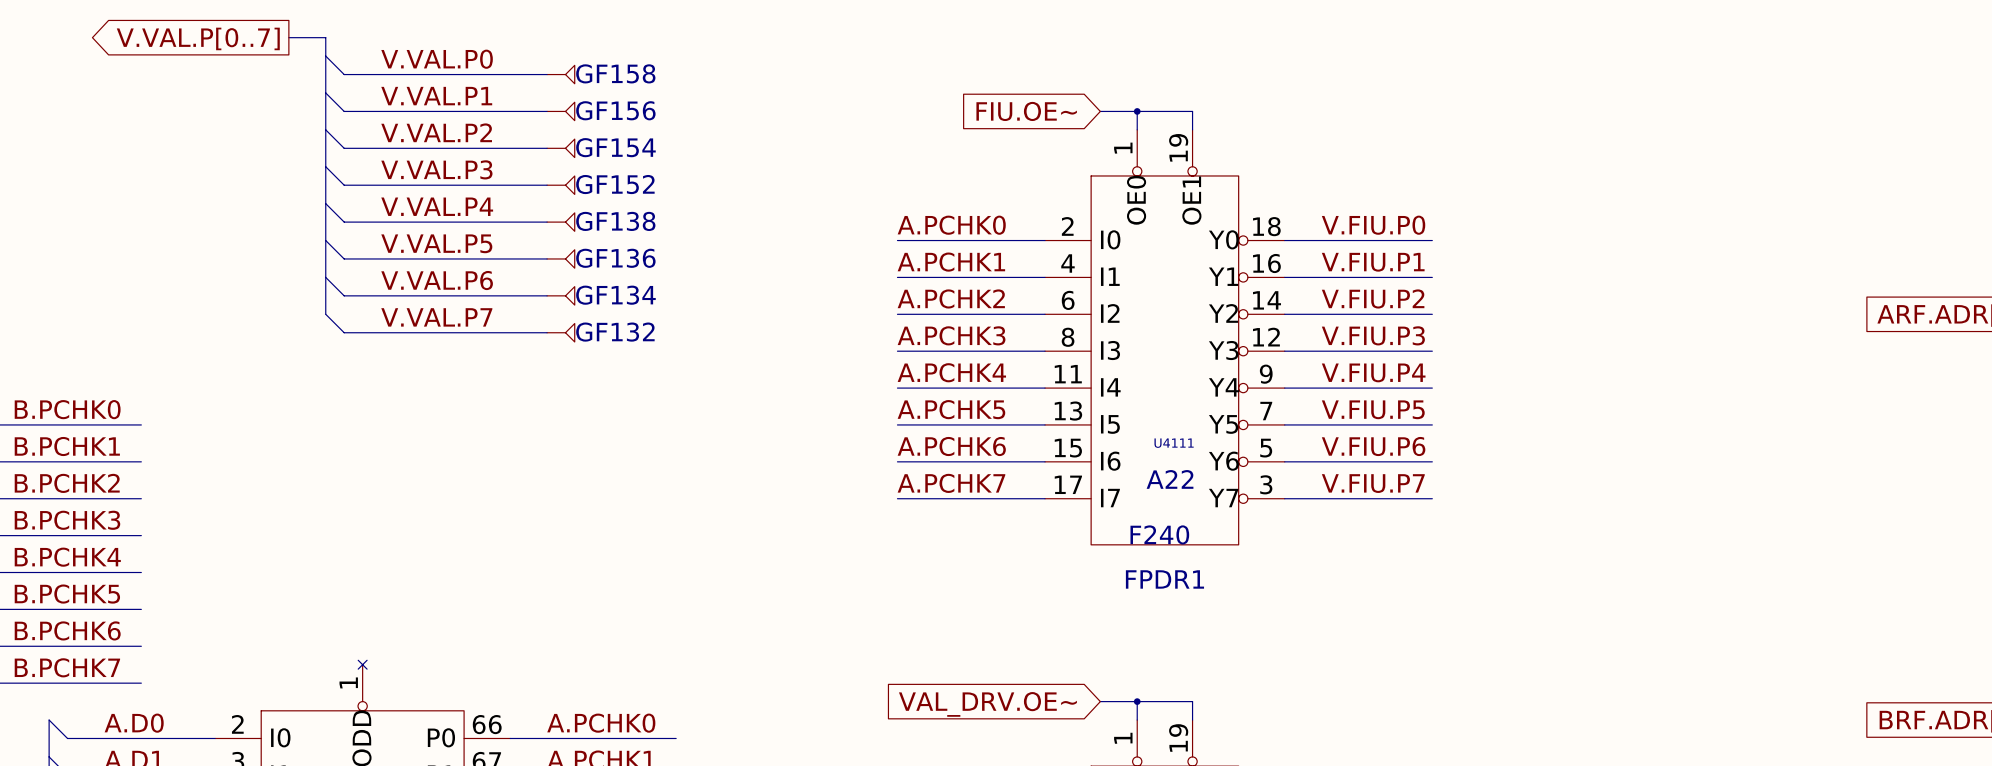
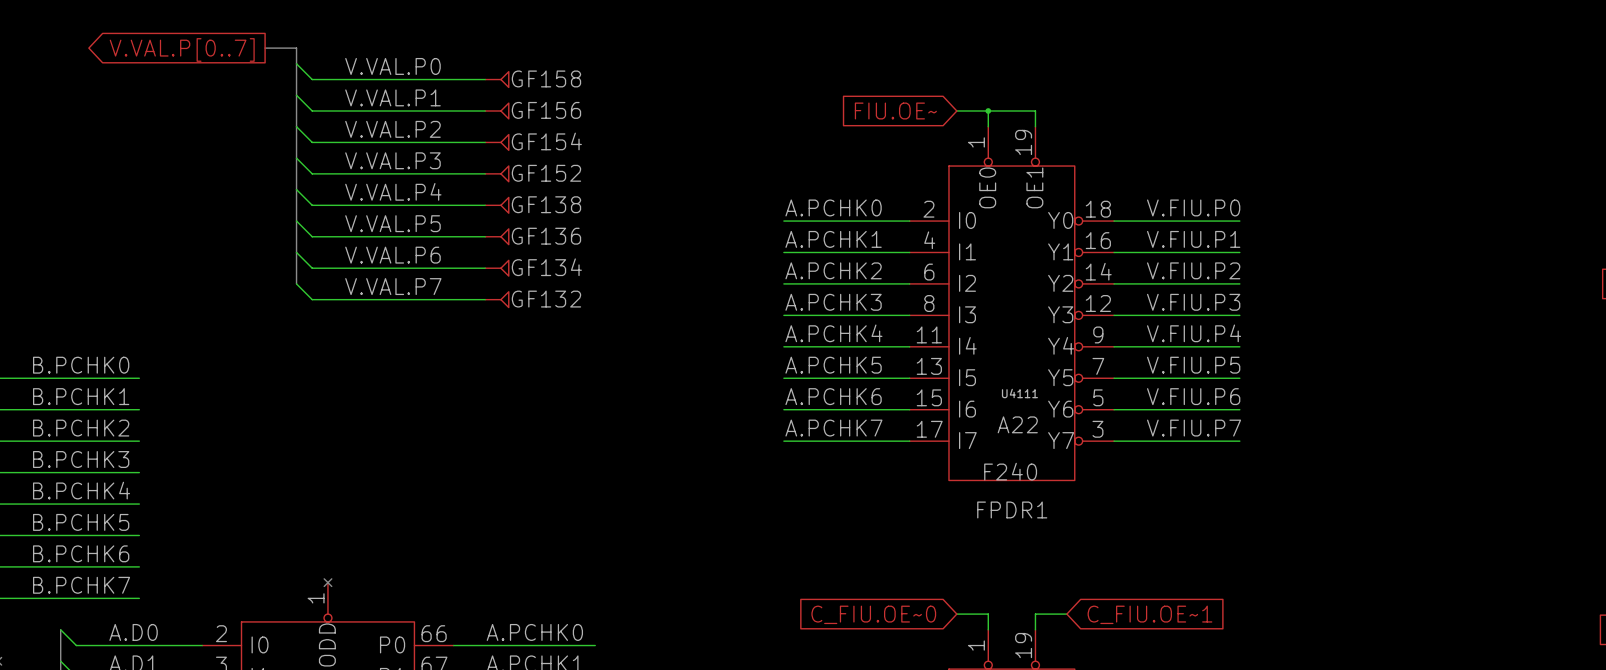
wire: (1137, 701) (1192, 701) -> (1066, 614) (1035, 614)
junction: (1137, 701) -> none
global label: VAL_DRV.OE~ (987, 704) -> C_FIU.OE~0 (873, 614)
global label: none -> C_FIU.OE~1 (1149, 614)

